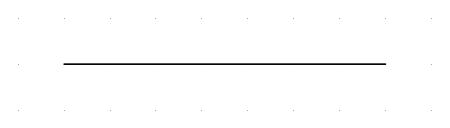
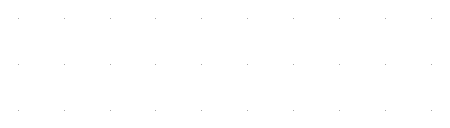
wire: (64, 64) (385, 64) -> none

